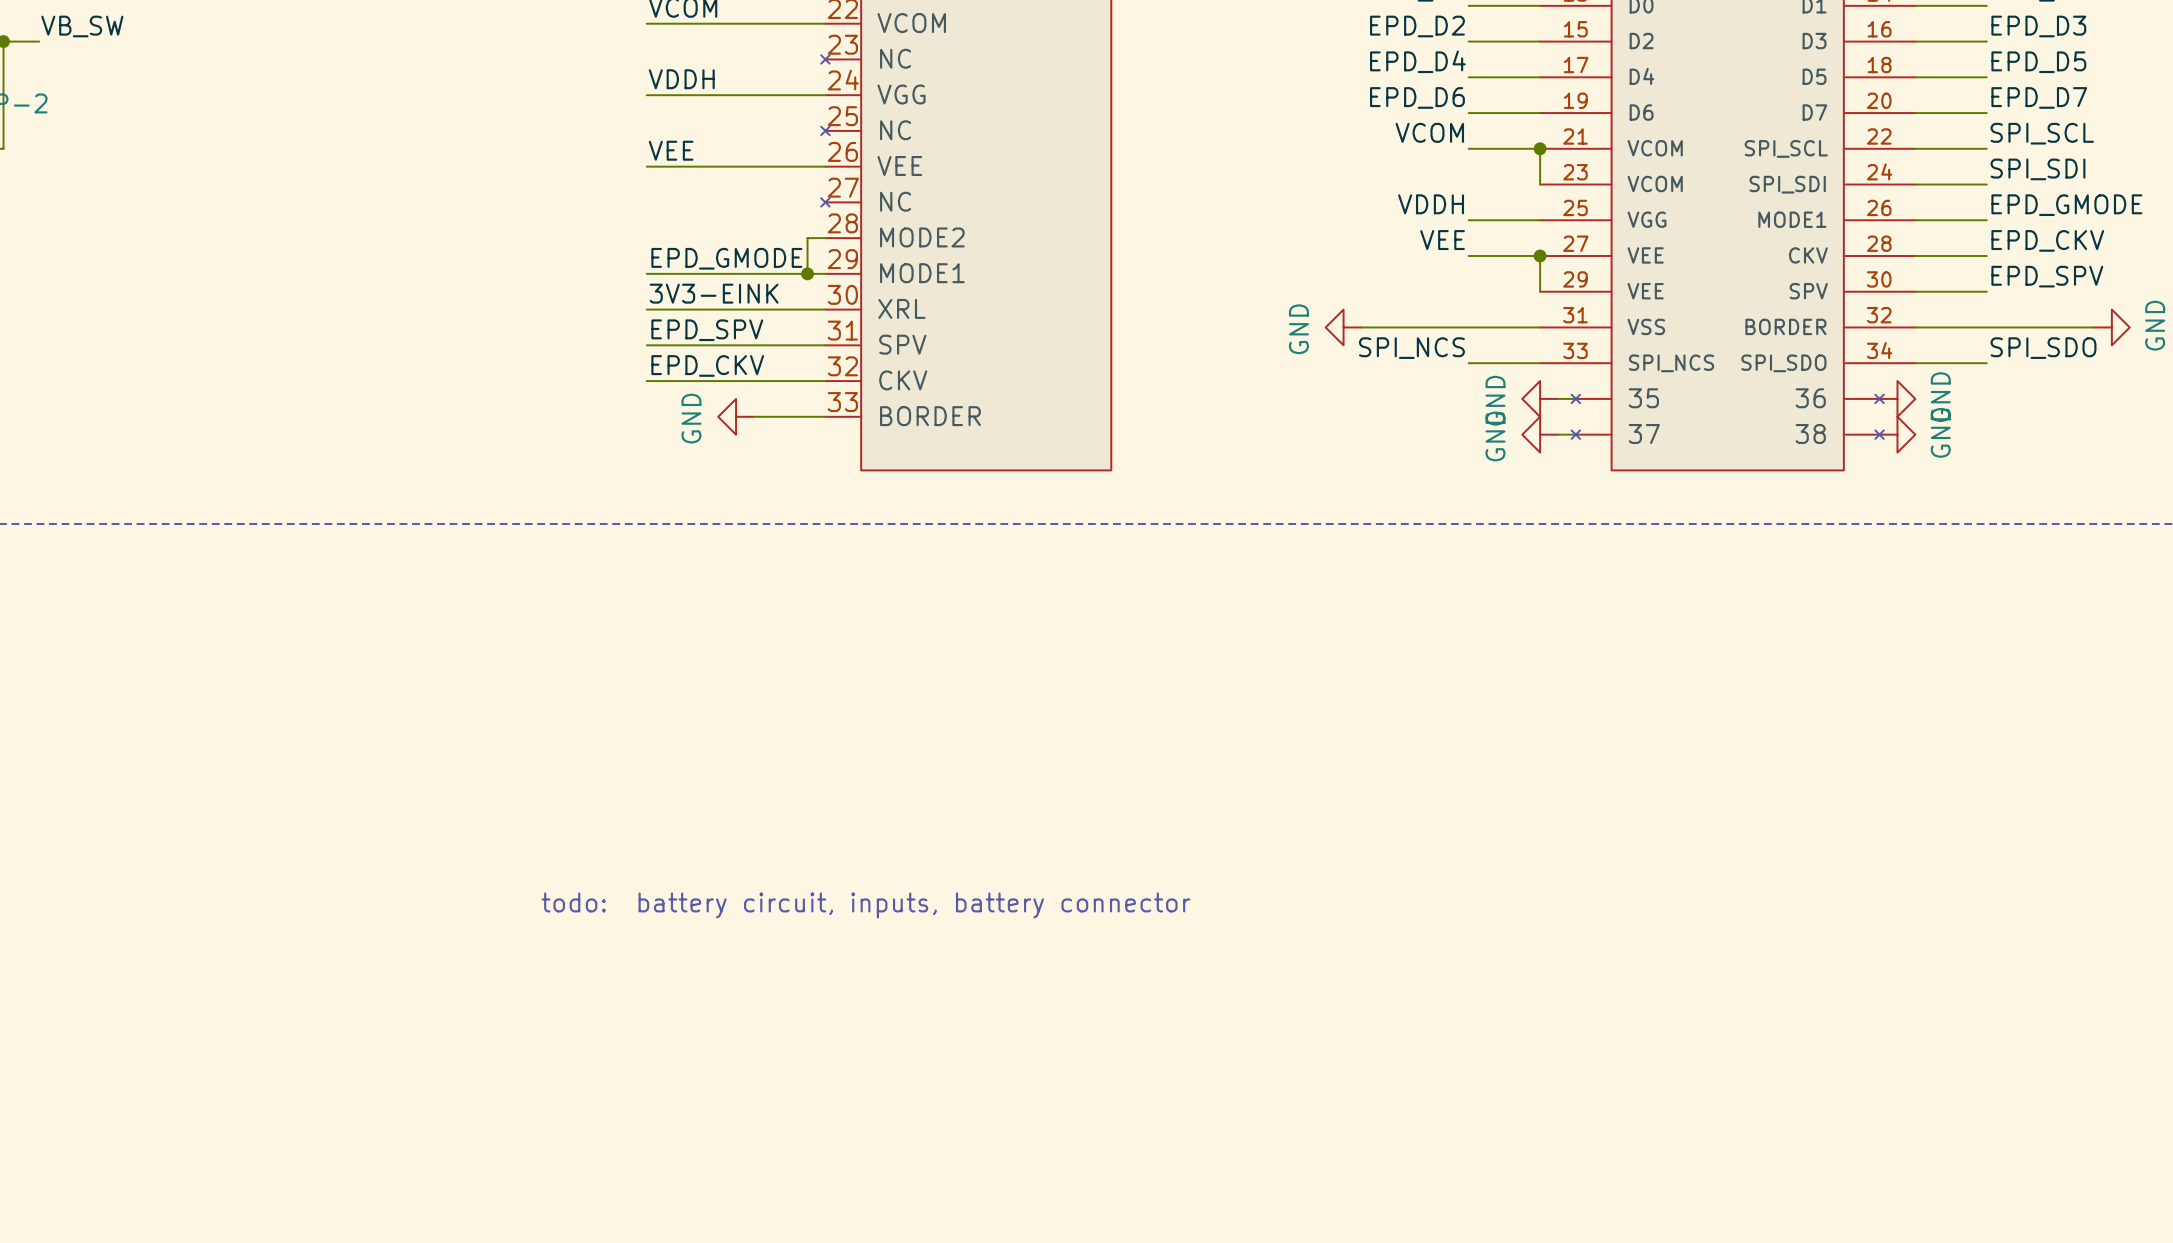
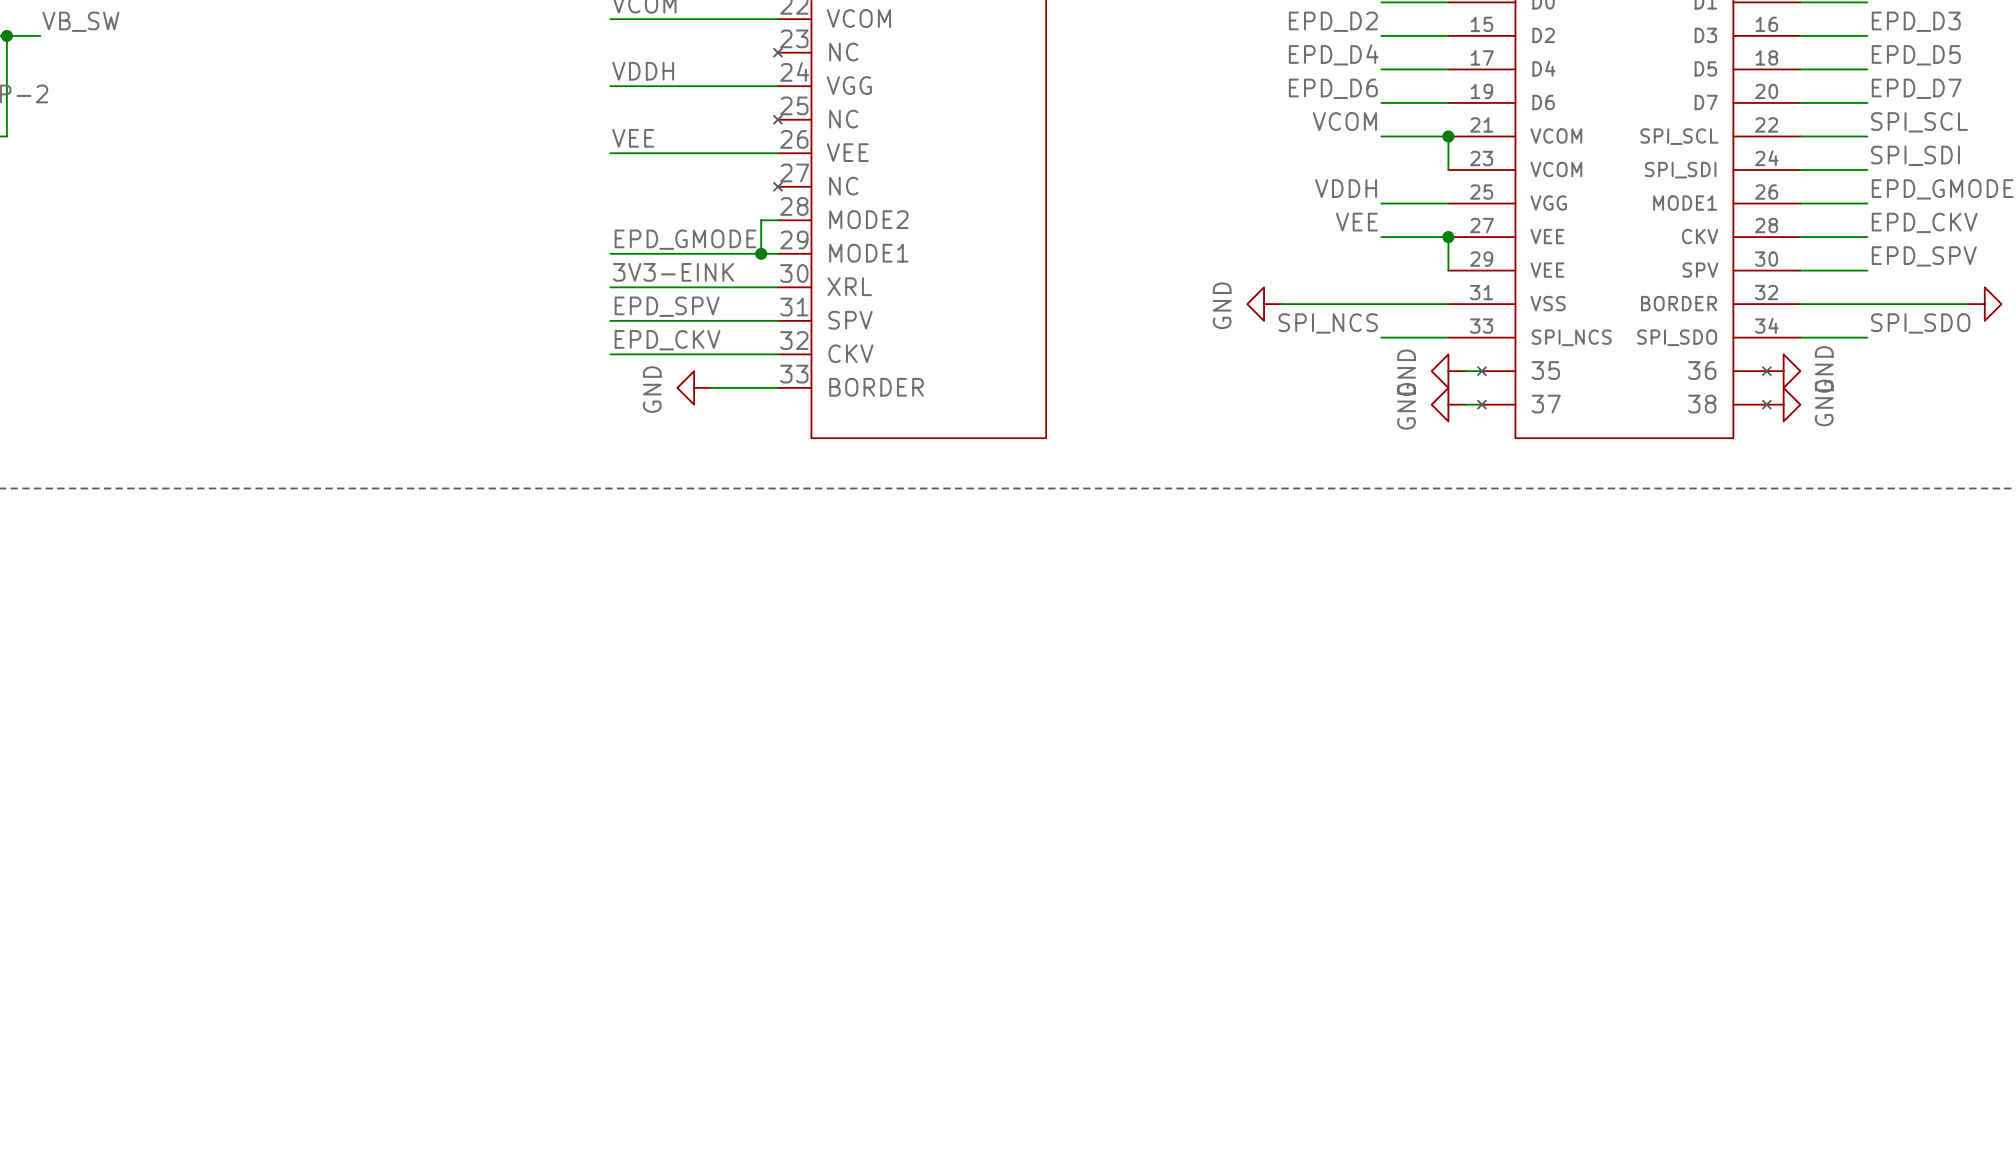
text: todo: battery circuit, inputs, battery connector (865, 905) -> none

